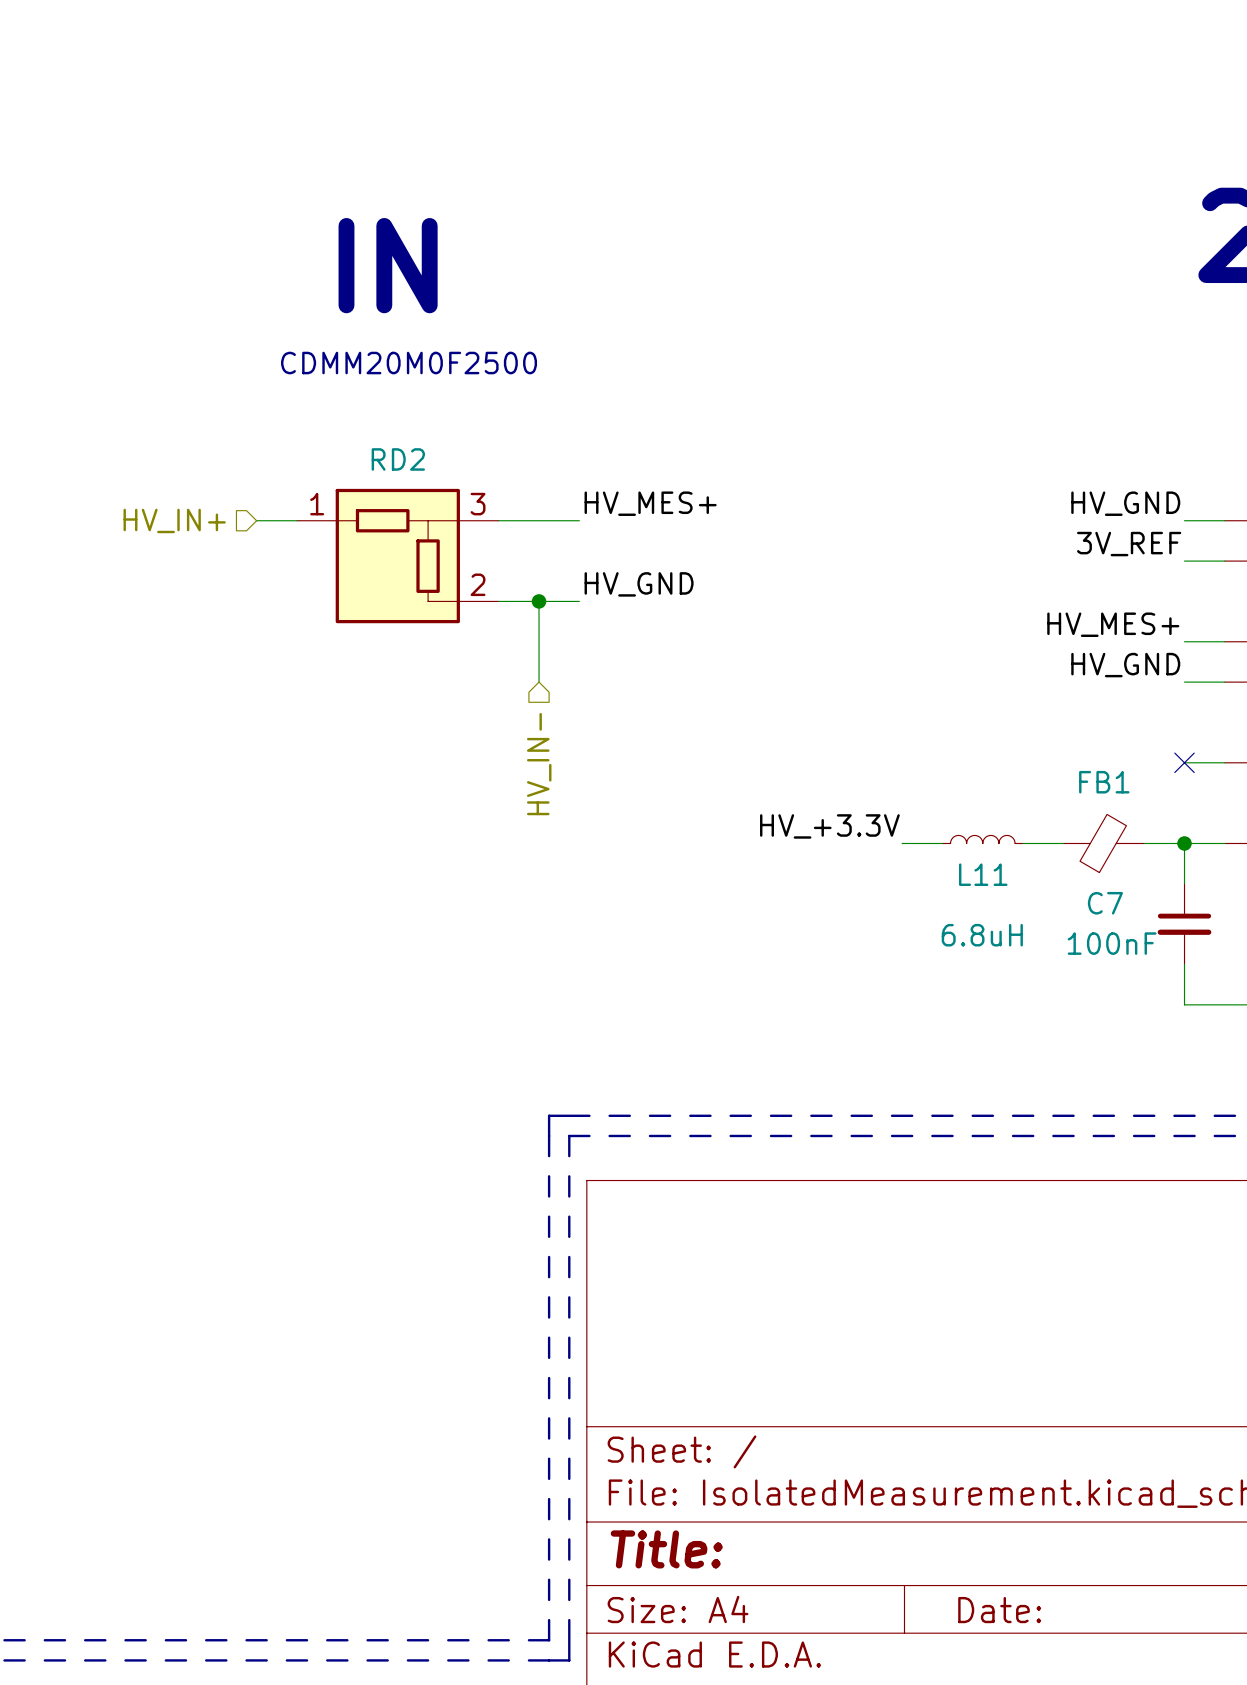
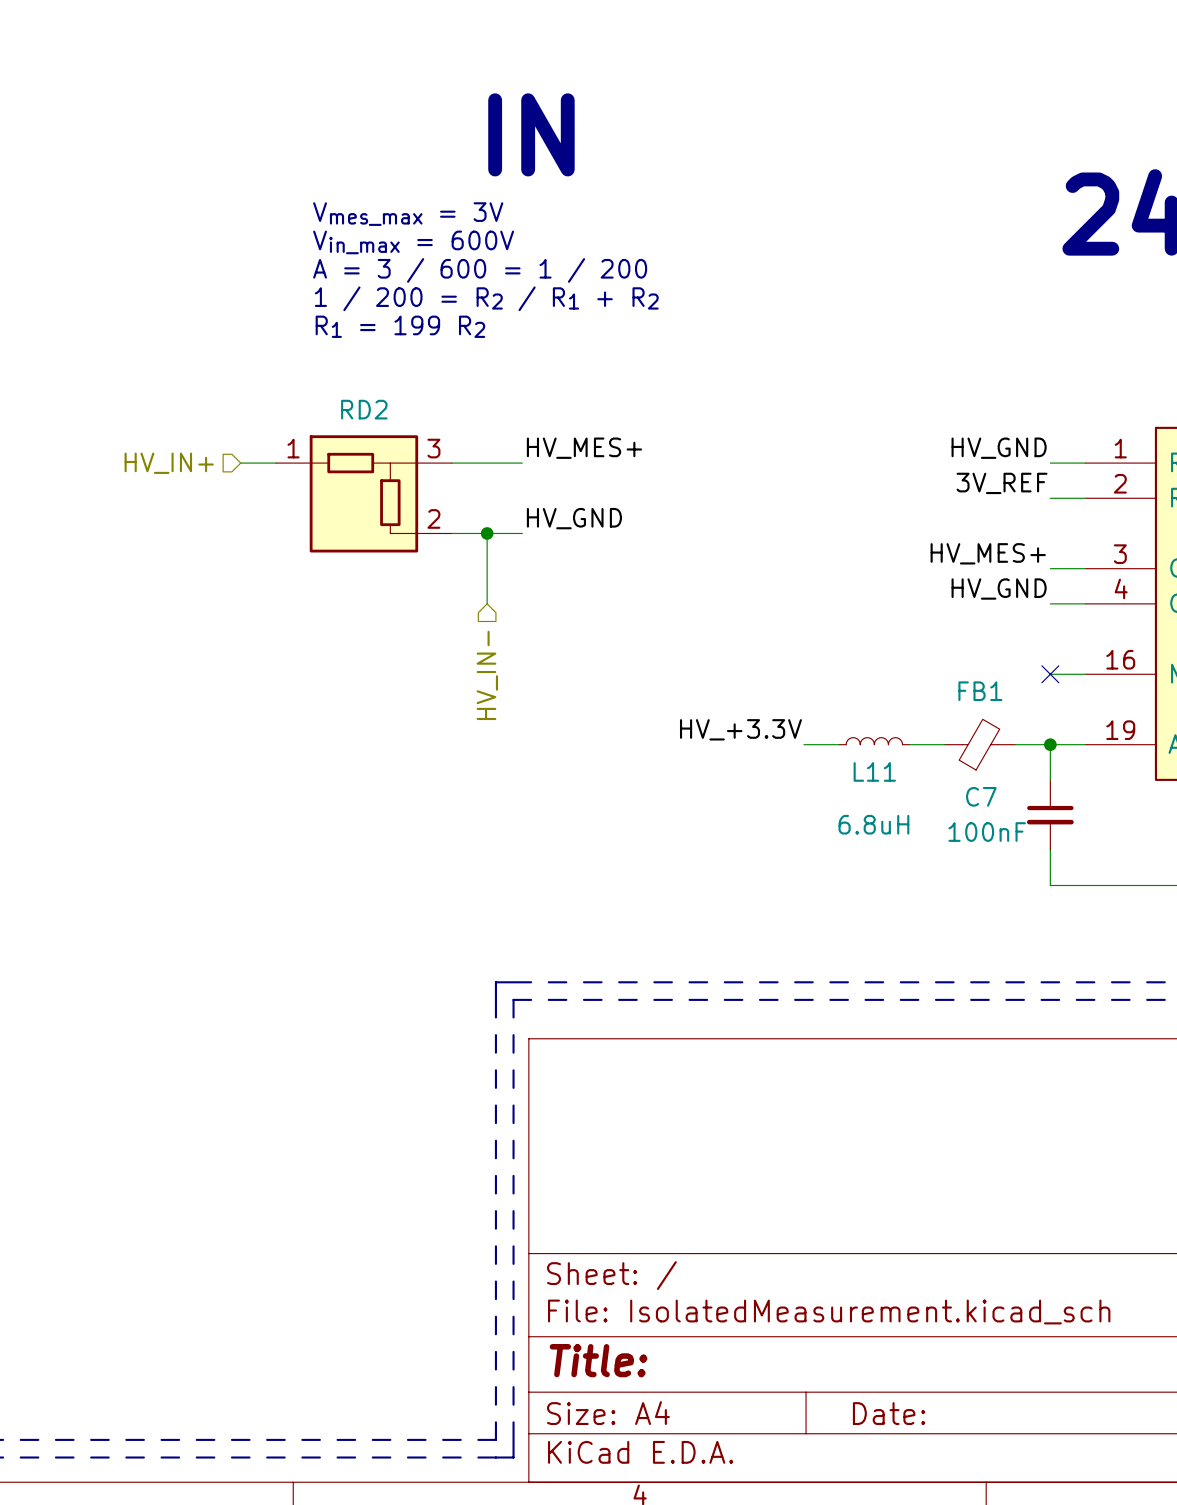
text: none -> Vmes_max = 3V (408, 214)
text position: IN (388, 265) -> IN (531, 134)
text: none -> Vin_max = 600V (413, 242)
text: none -> A = 3 / 600 = 1 / 200 (480, 270)
text: none -> 1 / 200 = R2 / R1 + R2 (486, 298)
text: CDMM20M0F2500 (409, 363) -> none
text: none -> R1 = 199 R2 (400, 326)

